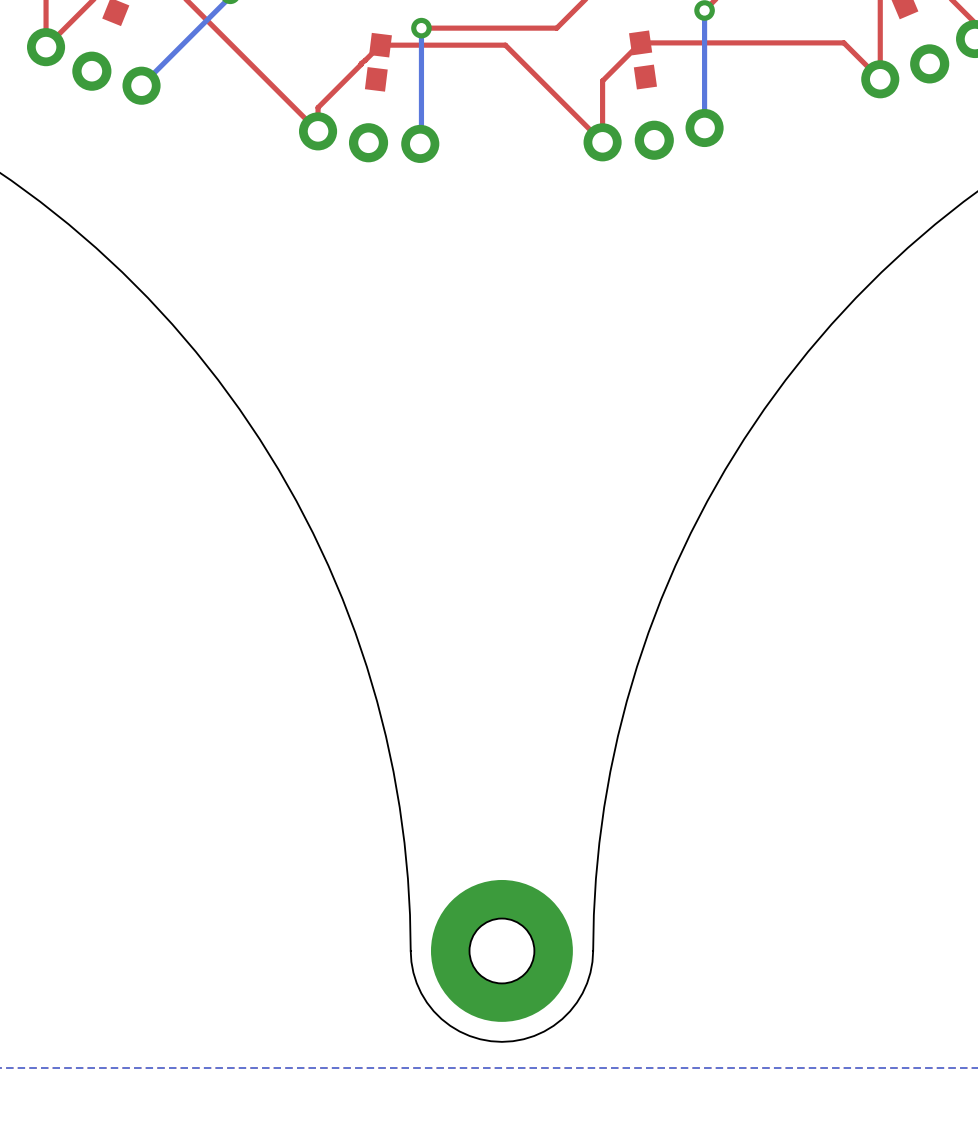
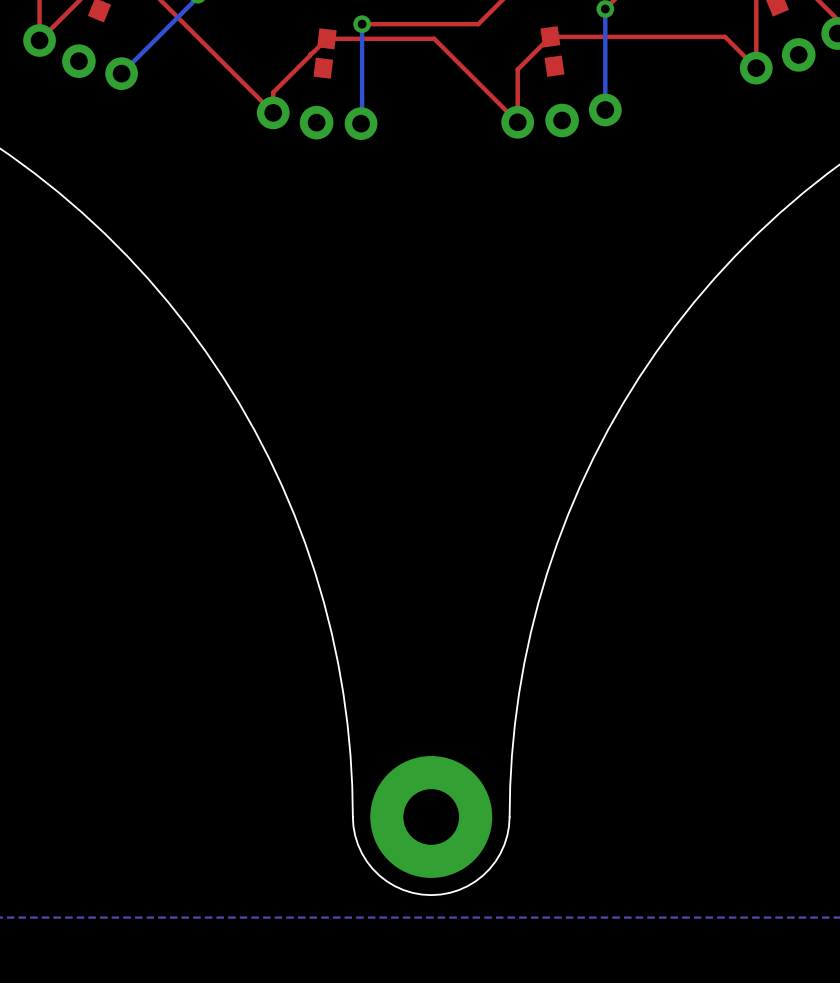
round board edge: [469, 918, 535, 984] -> none

